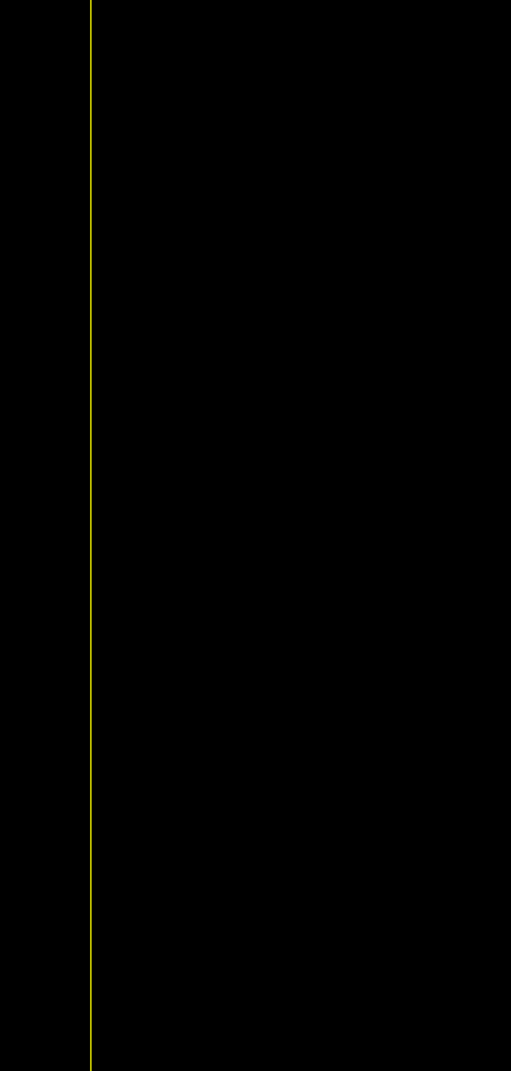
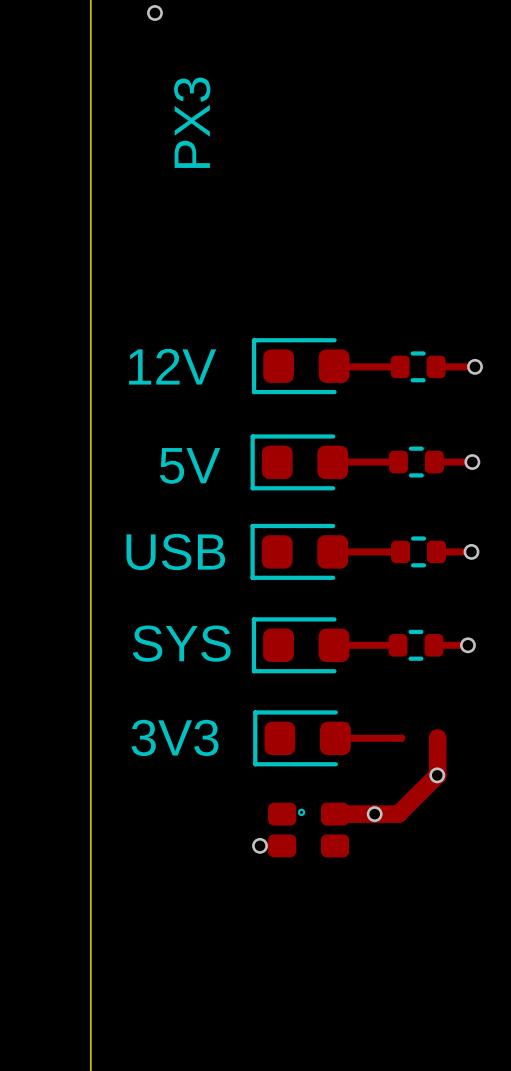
via: none -> (154, 13)
text: none -> PX3 (192, 122)
text: none -> 12V (172, 366)
part: none -> (300, 366)
track: none -> (334, 366) (400, 366)
part: none -> (418, 366)
track: none -> (436, 366) (475, 366)
via: none -> (475, 366)
part: none -> (299, 462)
track: none -> (333, 462) (398, 462)
part: none -> (416, 462)
track: none -> (434, 462) (472, 462)
via: none -> (472, 462)
text: none -> 5V (190, 465)
text: none -> USB (175, 551)
part: none -> (299, 551)
track: none -> (332, 551) (400, 551)
part: none -> (418, 551)
track: none -> (436, 551) (471, 551)
via: none -> (471, 551)
text: none -> SYS (181, 643)
part: none -> (300, 645)
track: none -> (334, 645) (398, 645)
part: none -> (415, 645)
track: none -> (433, 645) (467, 645)
via: none -> (467, 645)
text: none -> 3V3 (175, 737)
part: none -> (301, 738)
track: none -> (335, 738) (401, 738)
track: none -> (437, 738) (437, 774) (398, 814) (335, 814)
via: none -> (437, 775)
via: none -> (374, 814)
part: none -> (308, 829)
via: none -> (260, 845)

